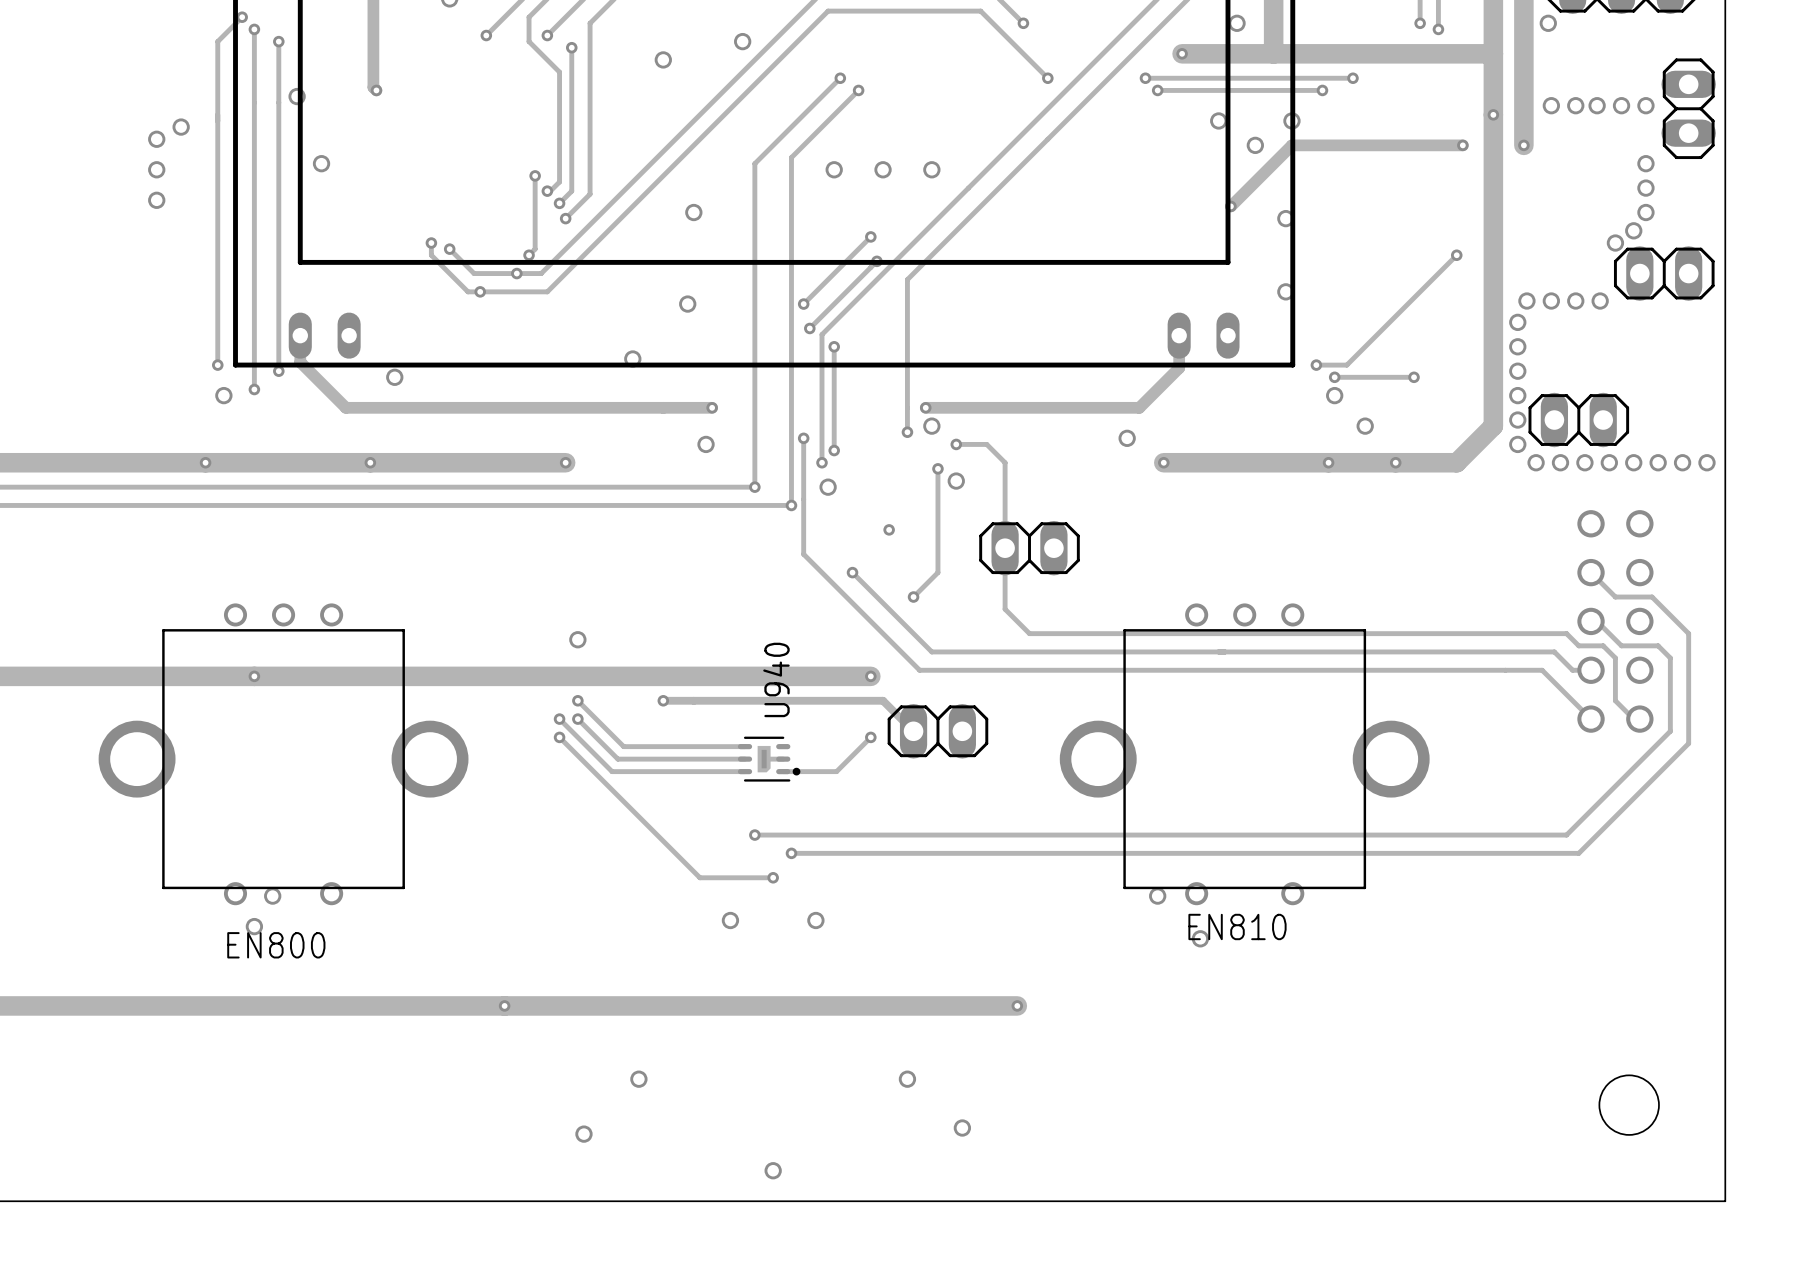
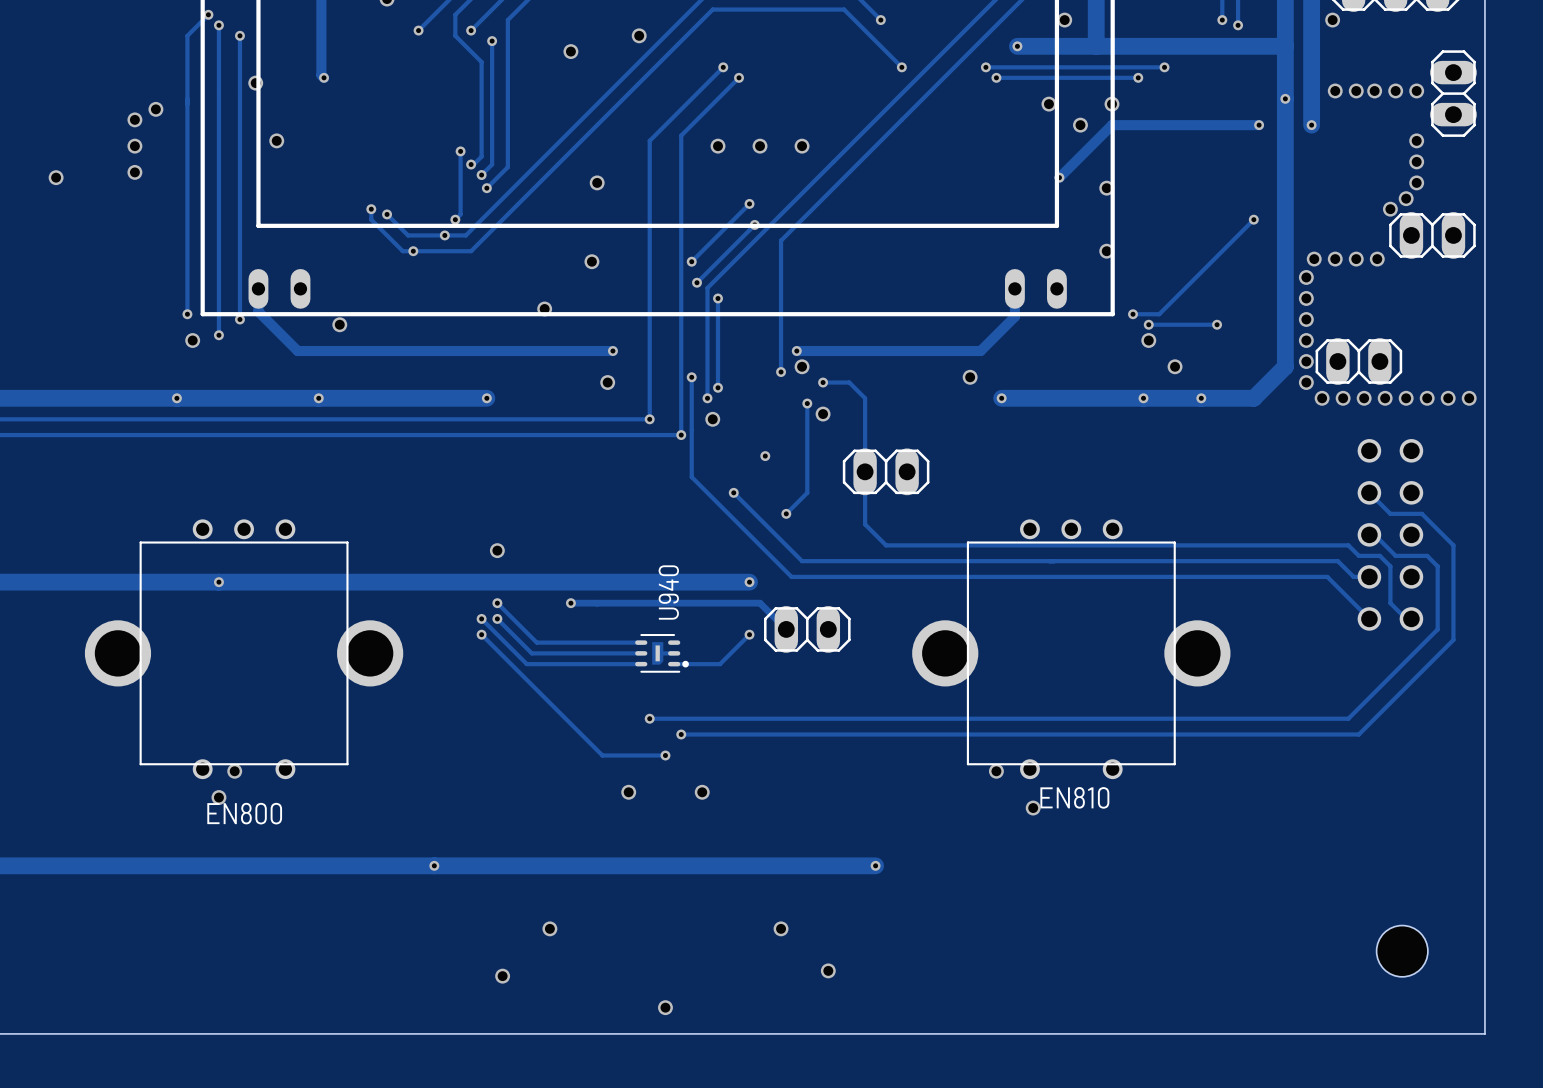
via: none -> (56, 177)

